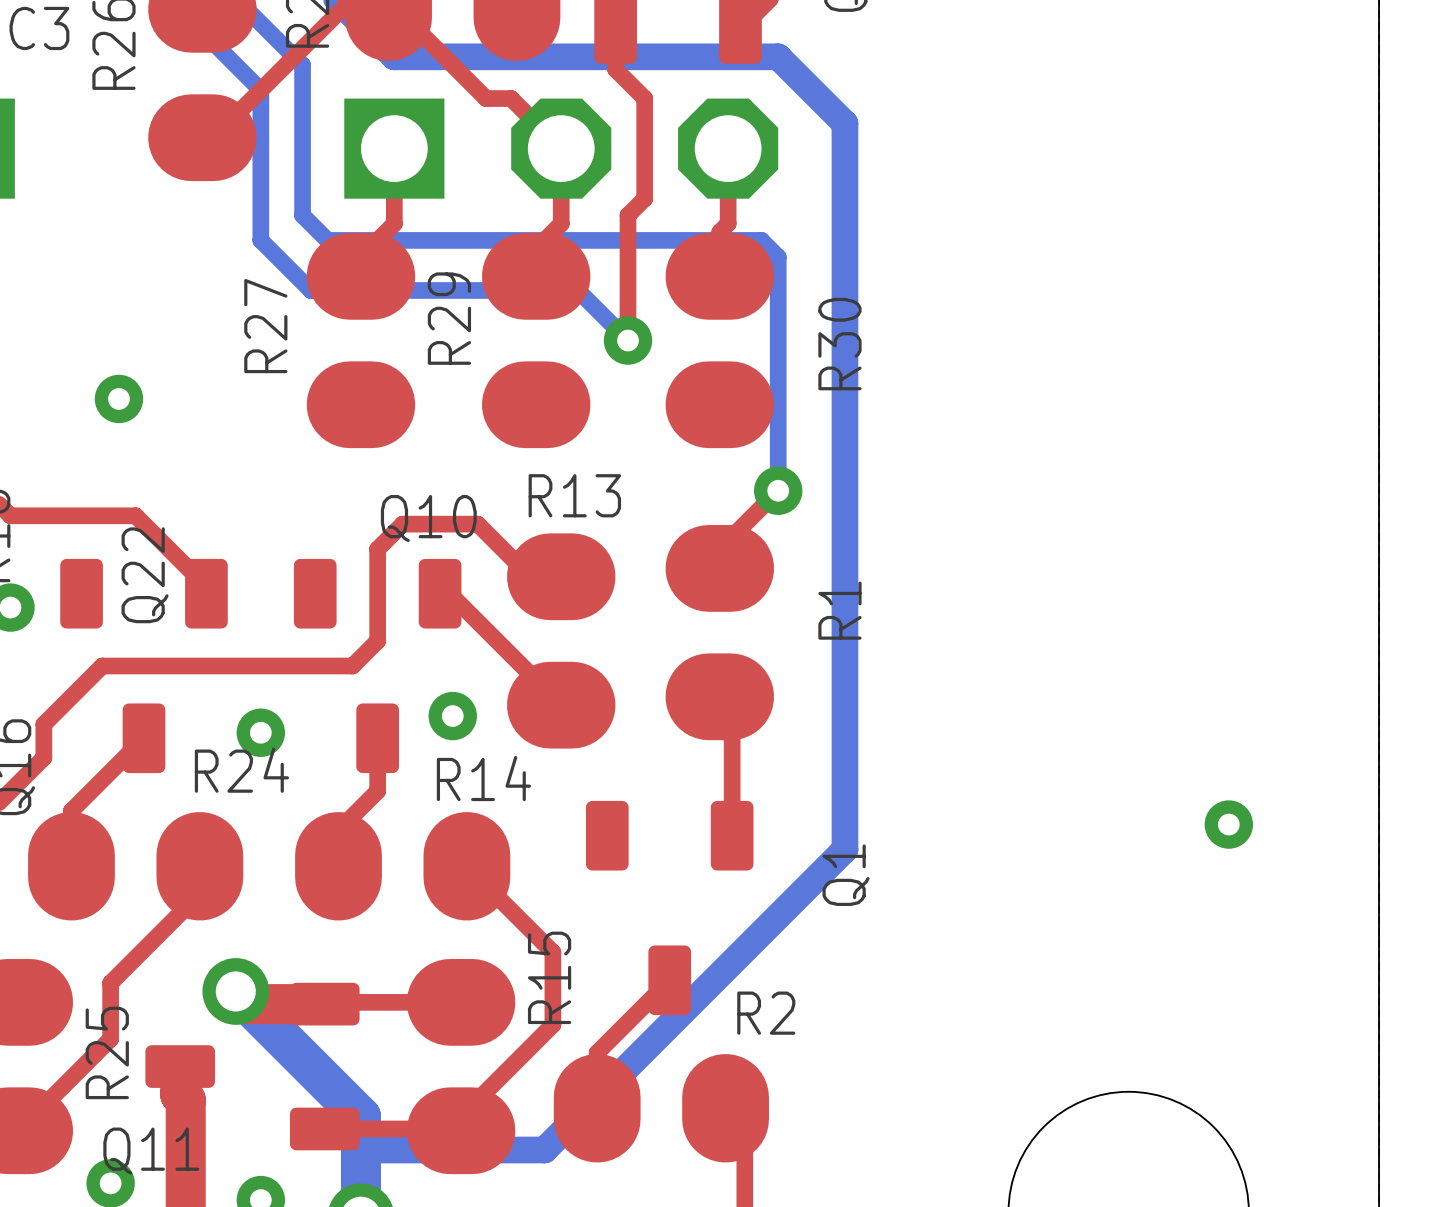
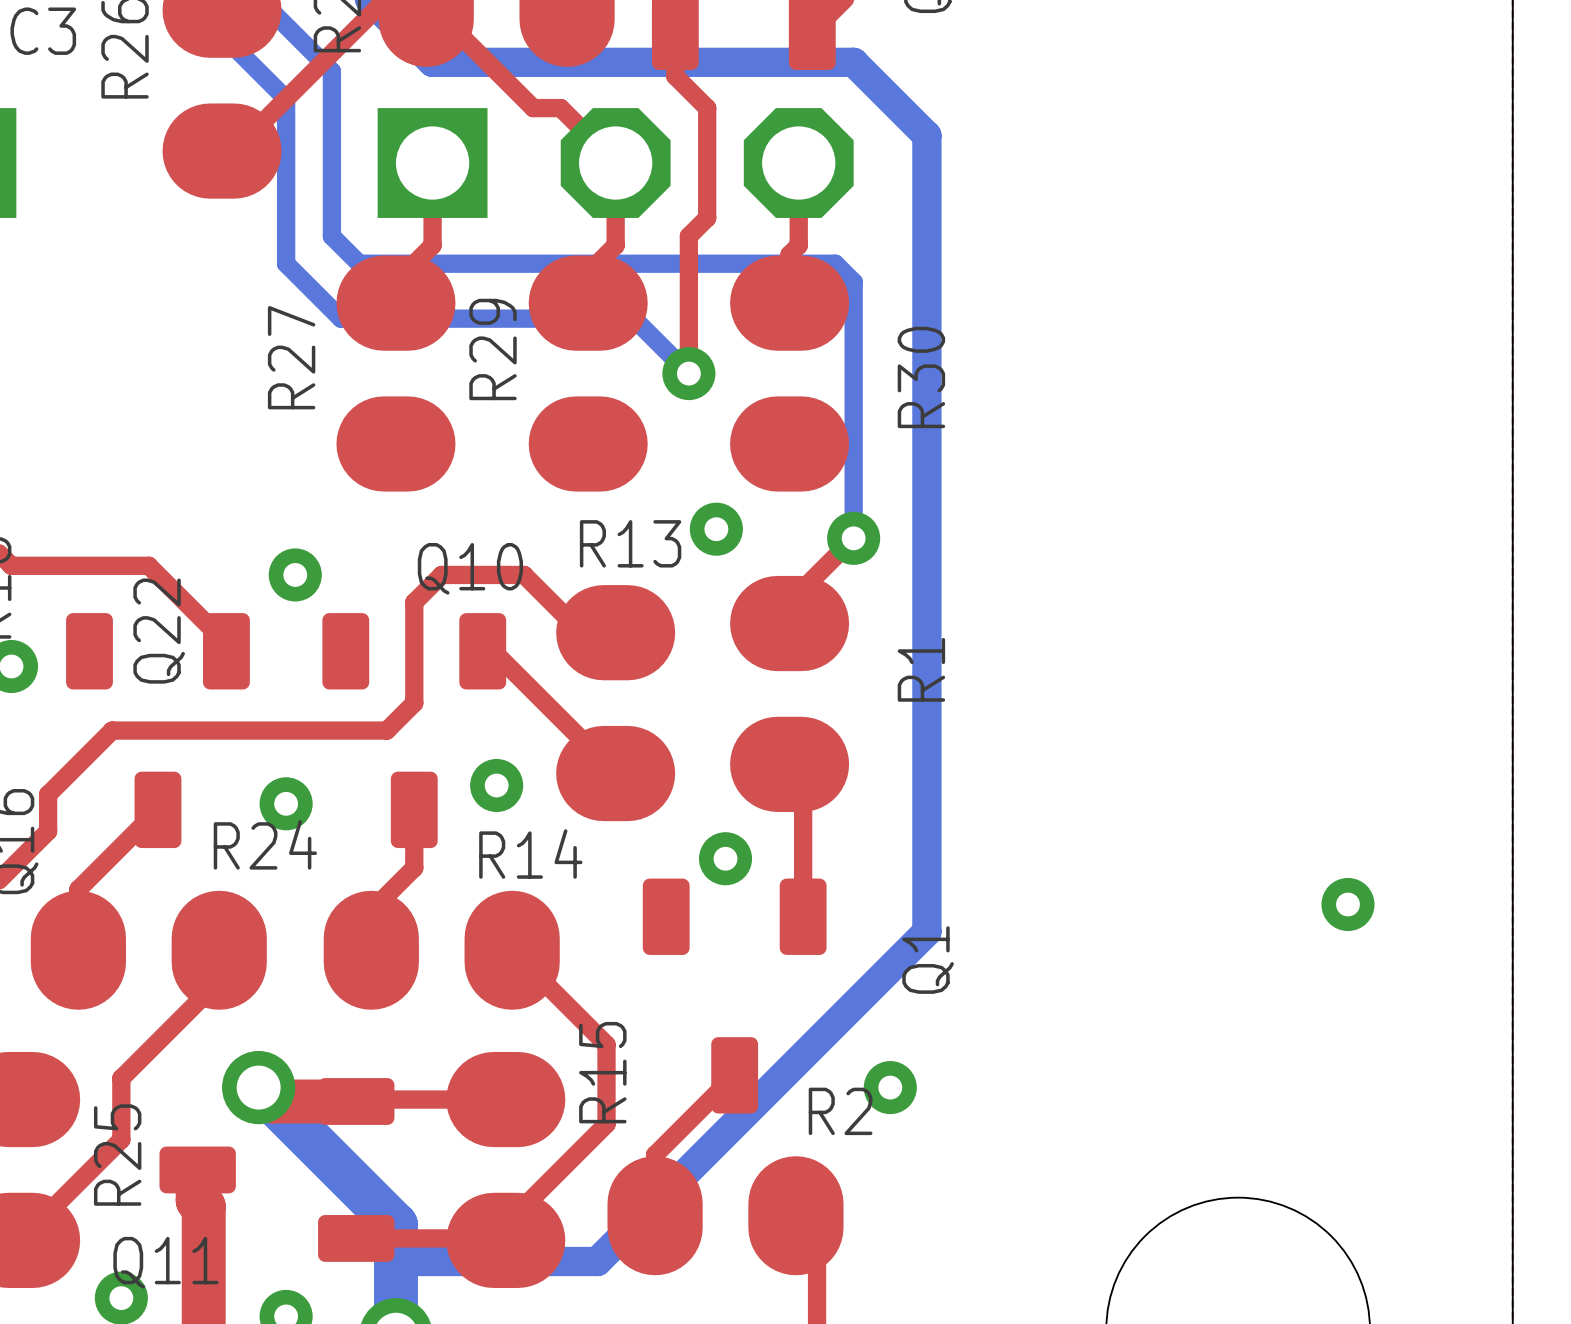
via position: (118, 398) -> (295, 574)
via: none -> (716, 529)
via: none -> (725, 858)
via: none -> (890, 1087)

